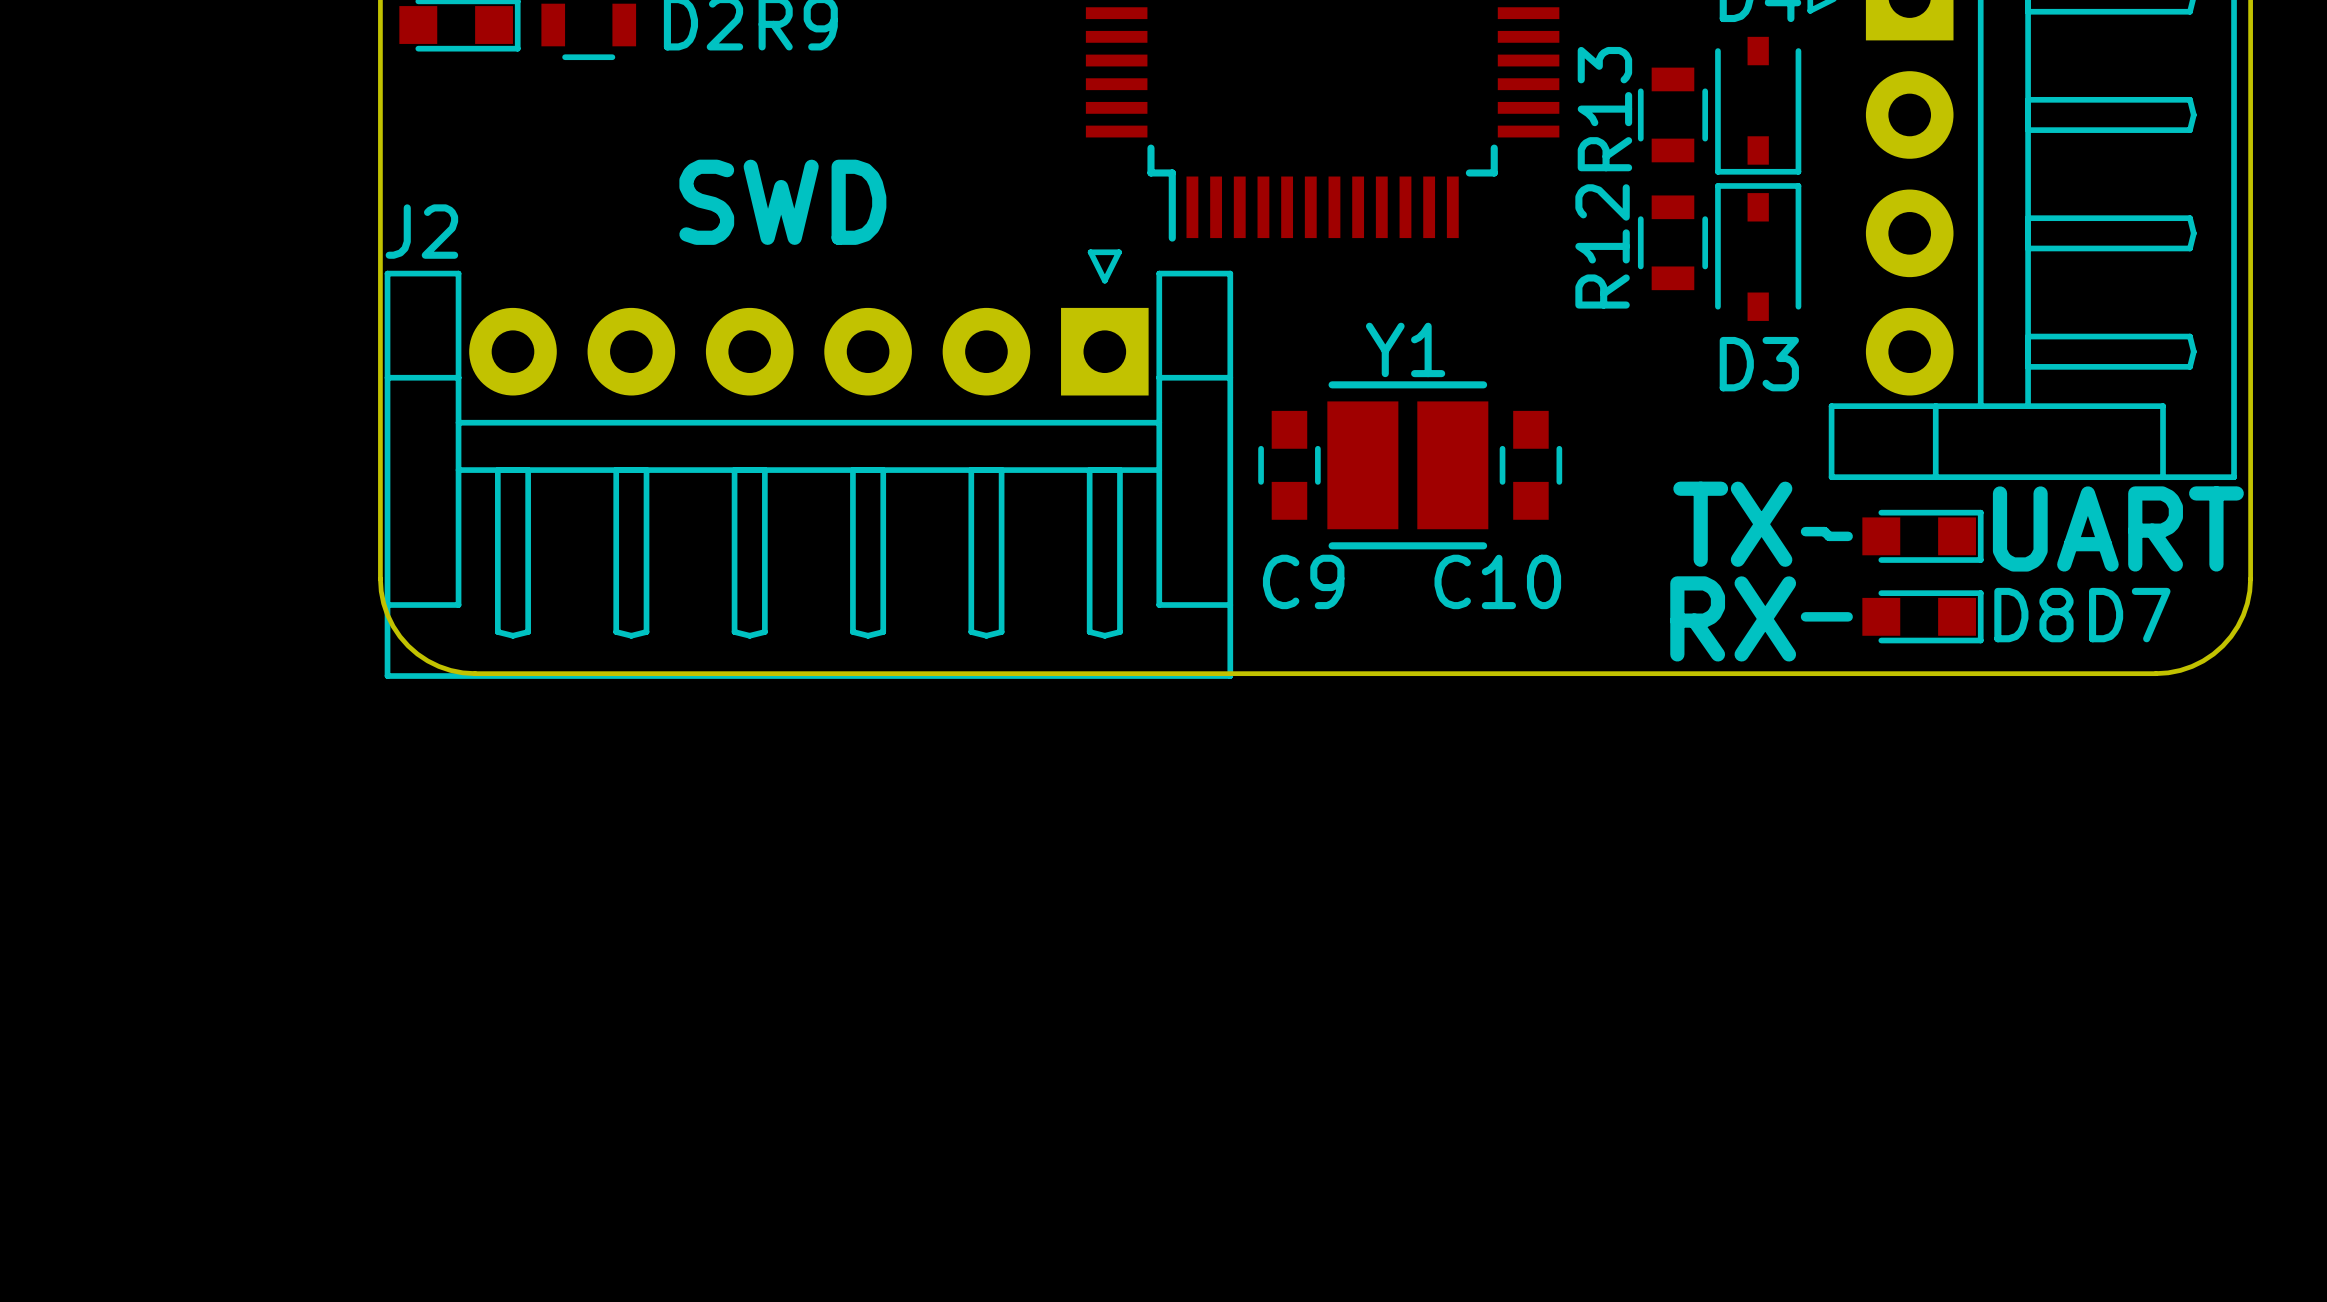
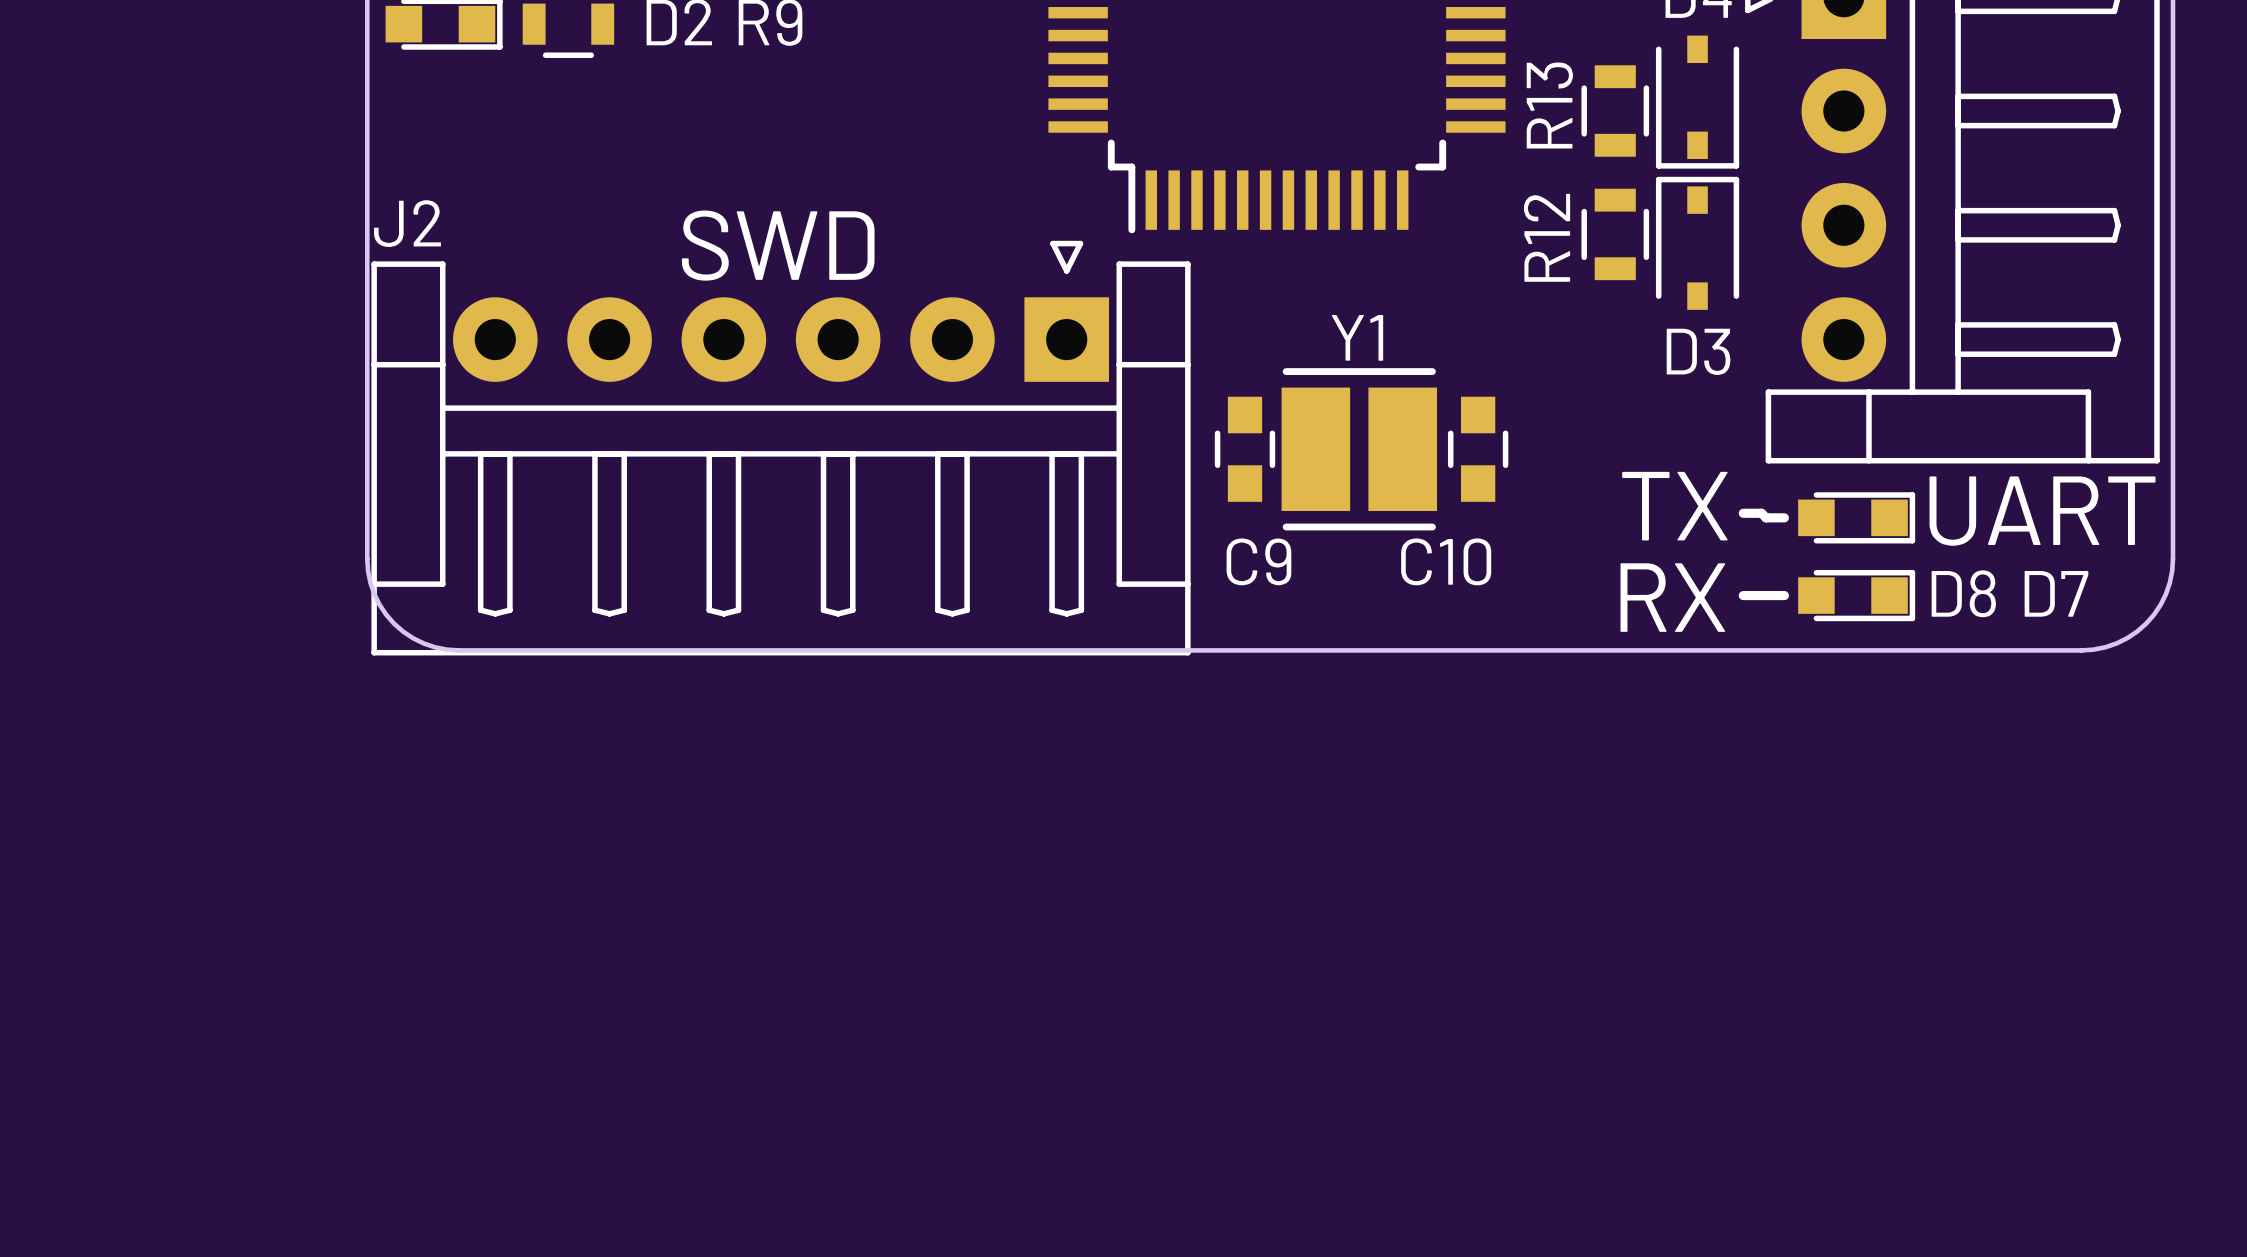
text position: SWD (782, 202) -> SWD (778, 245)

